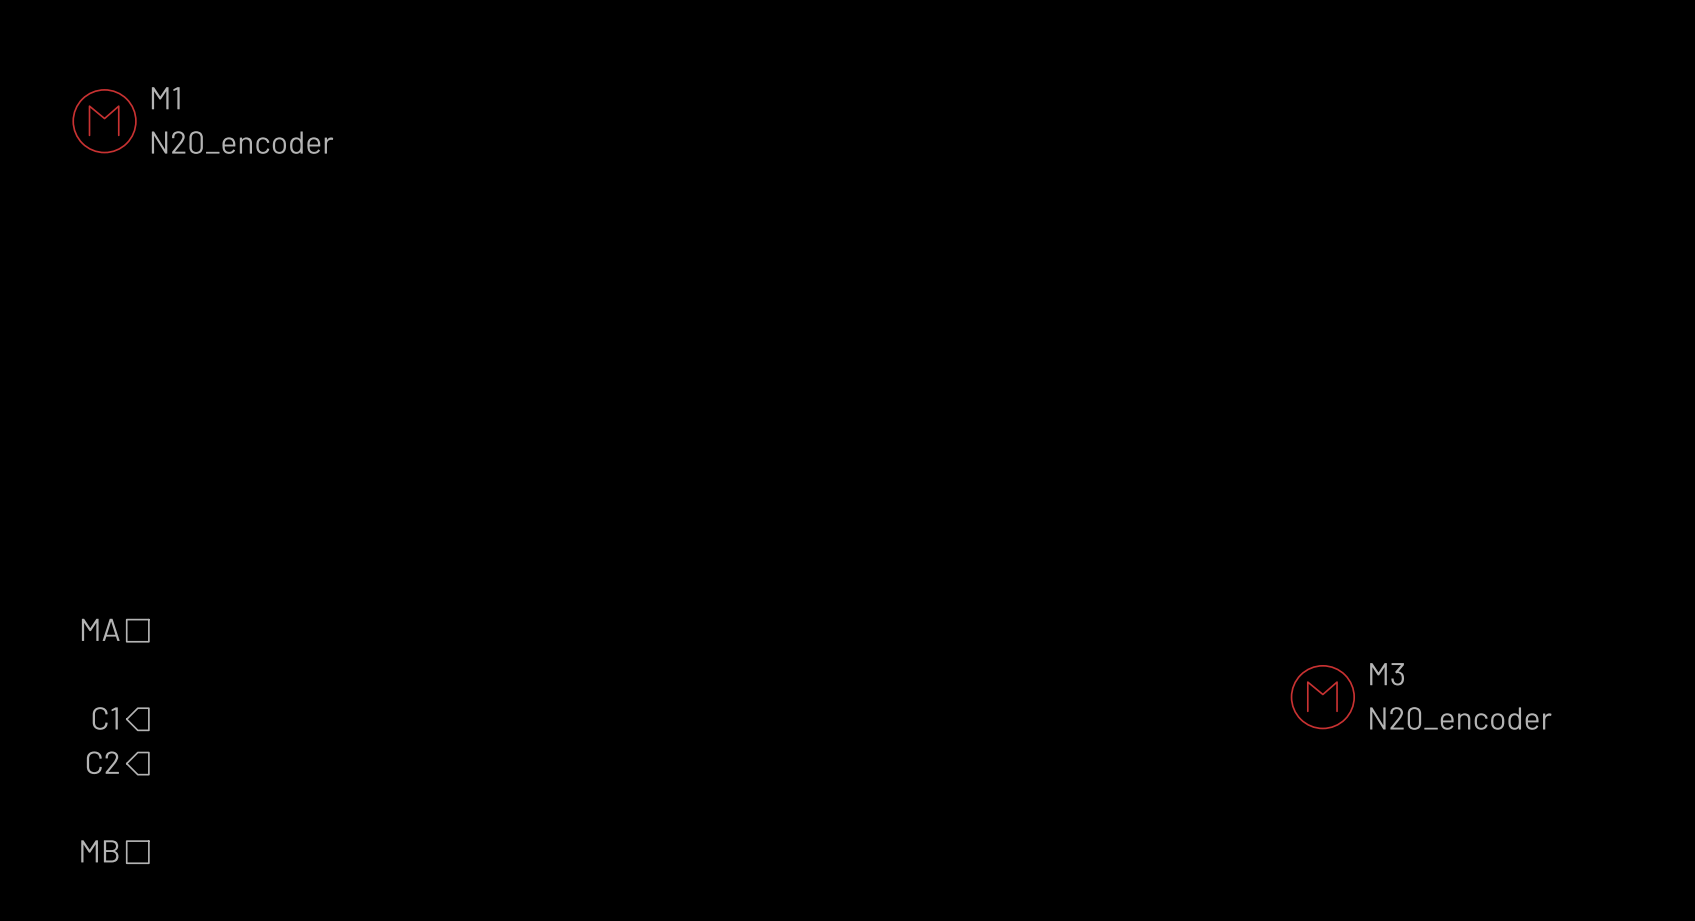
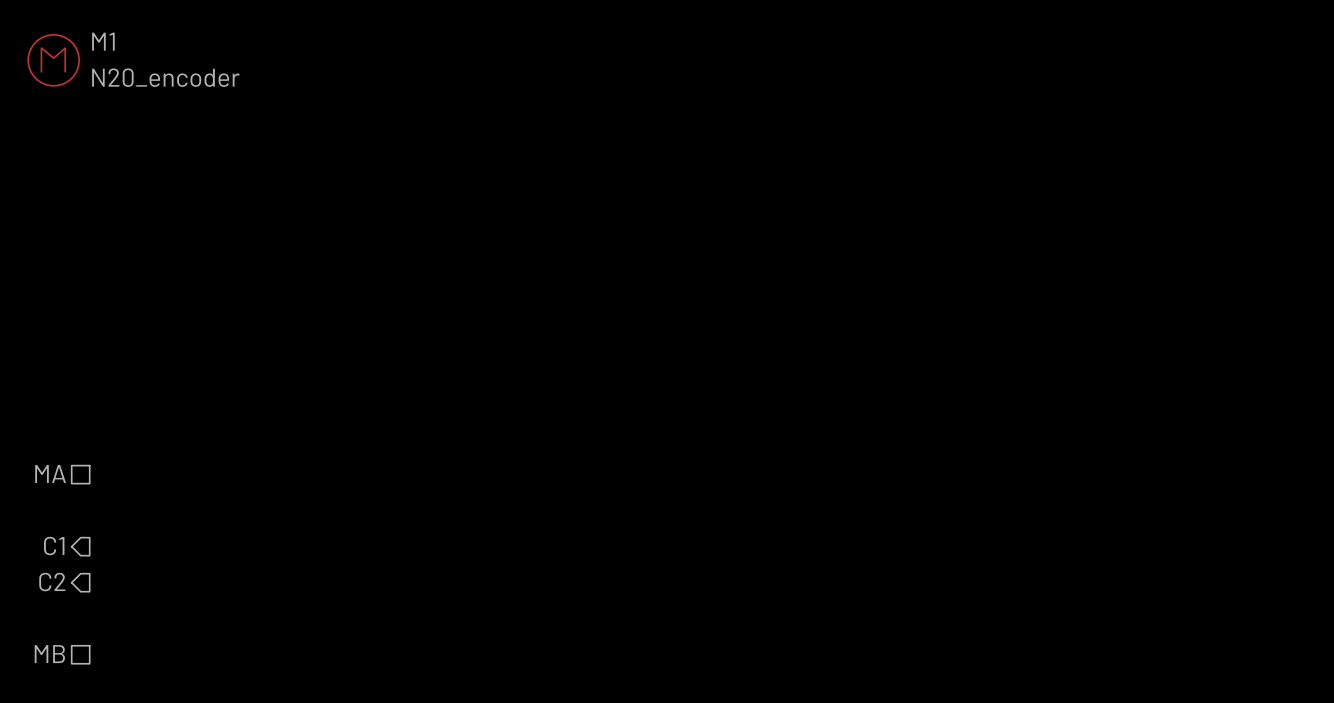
M3: N20_encoder (1322, 697) -> none

